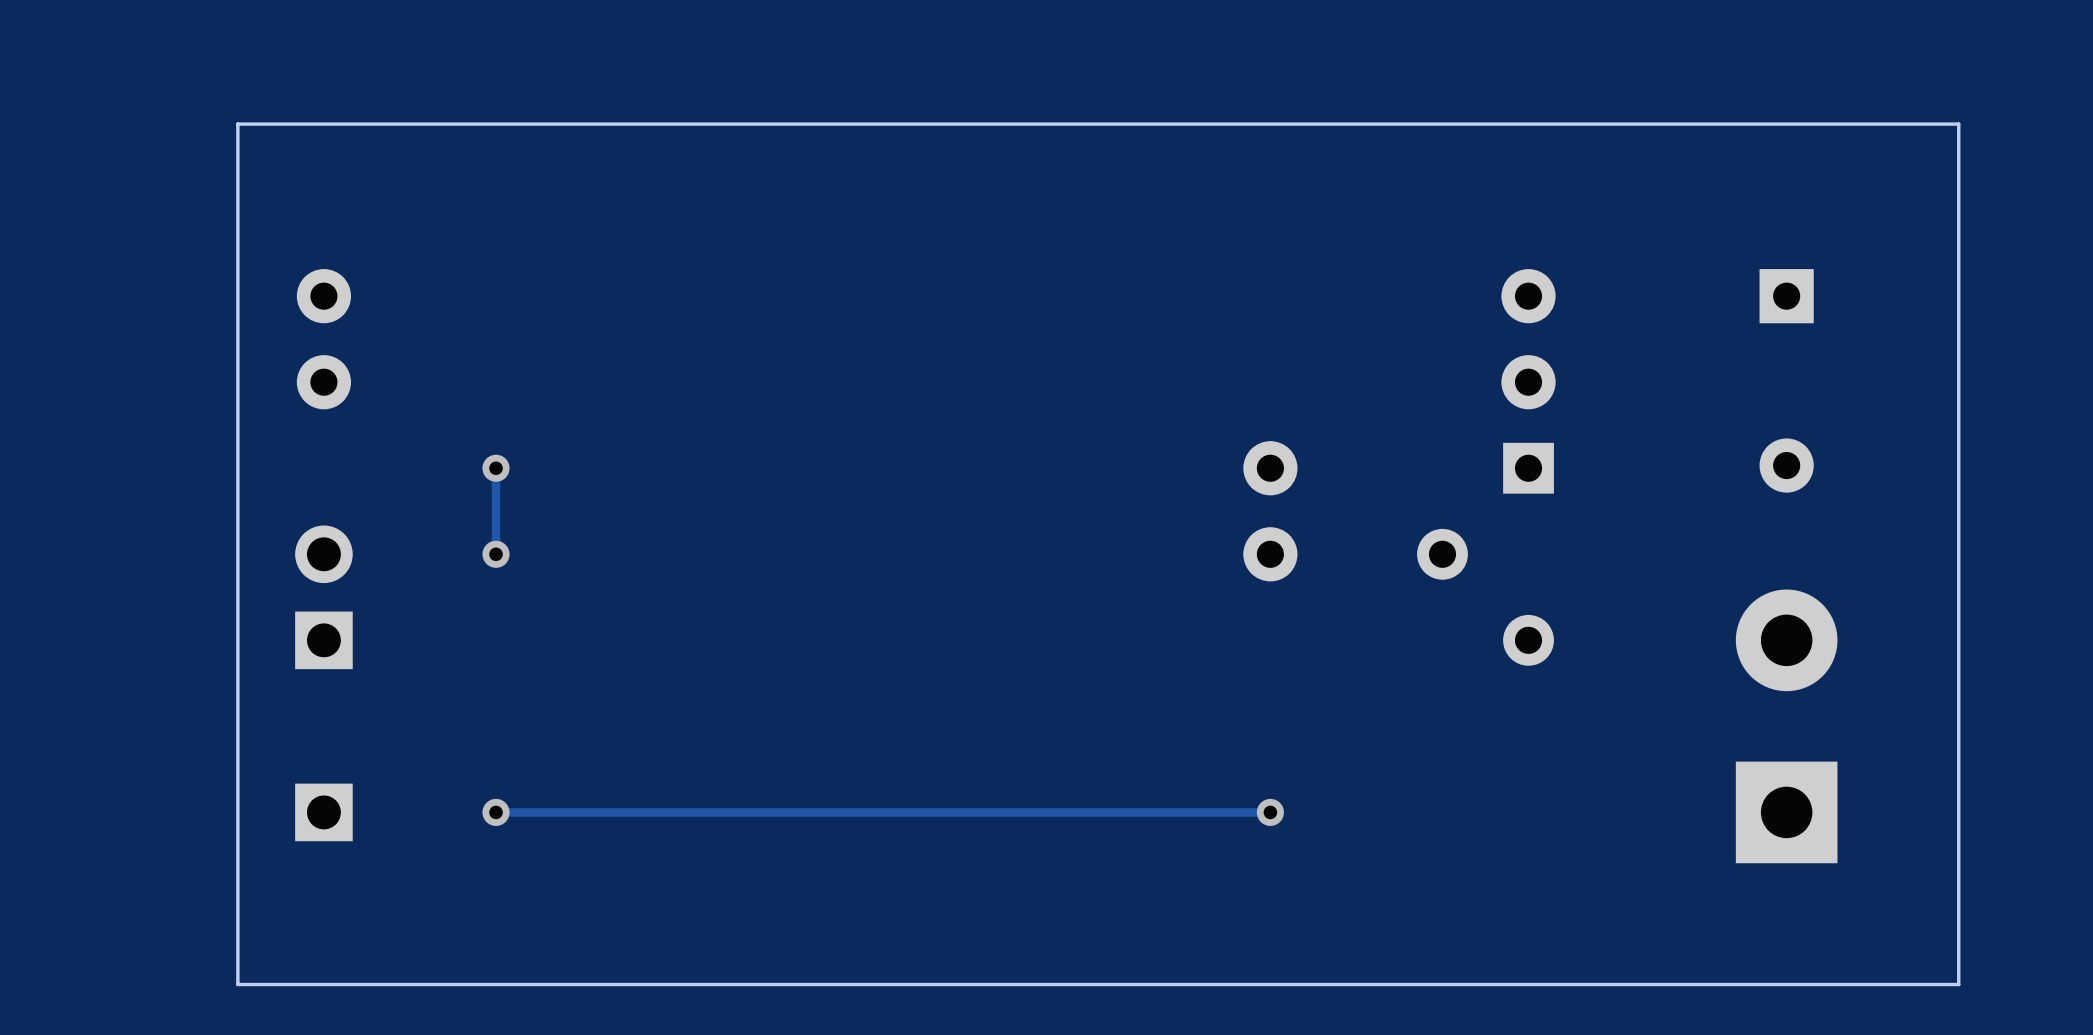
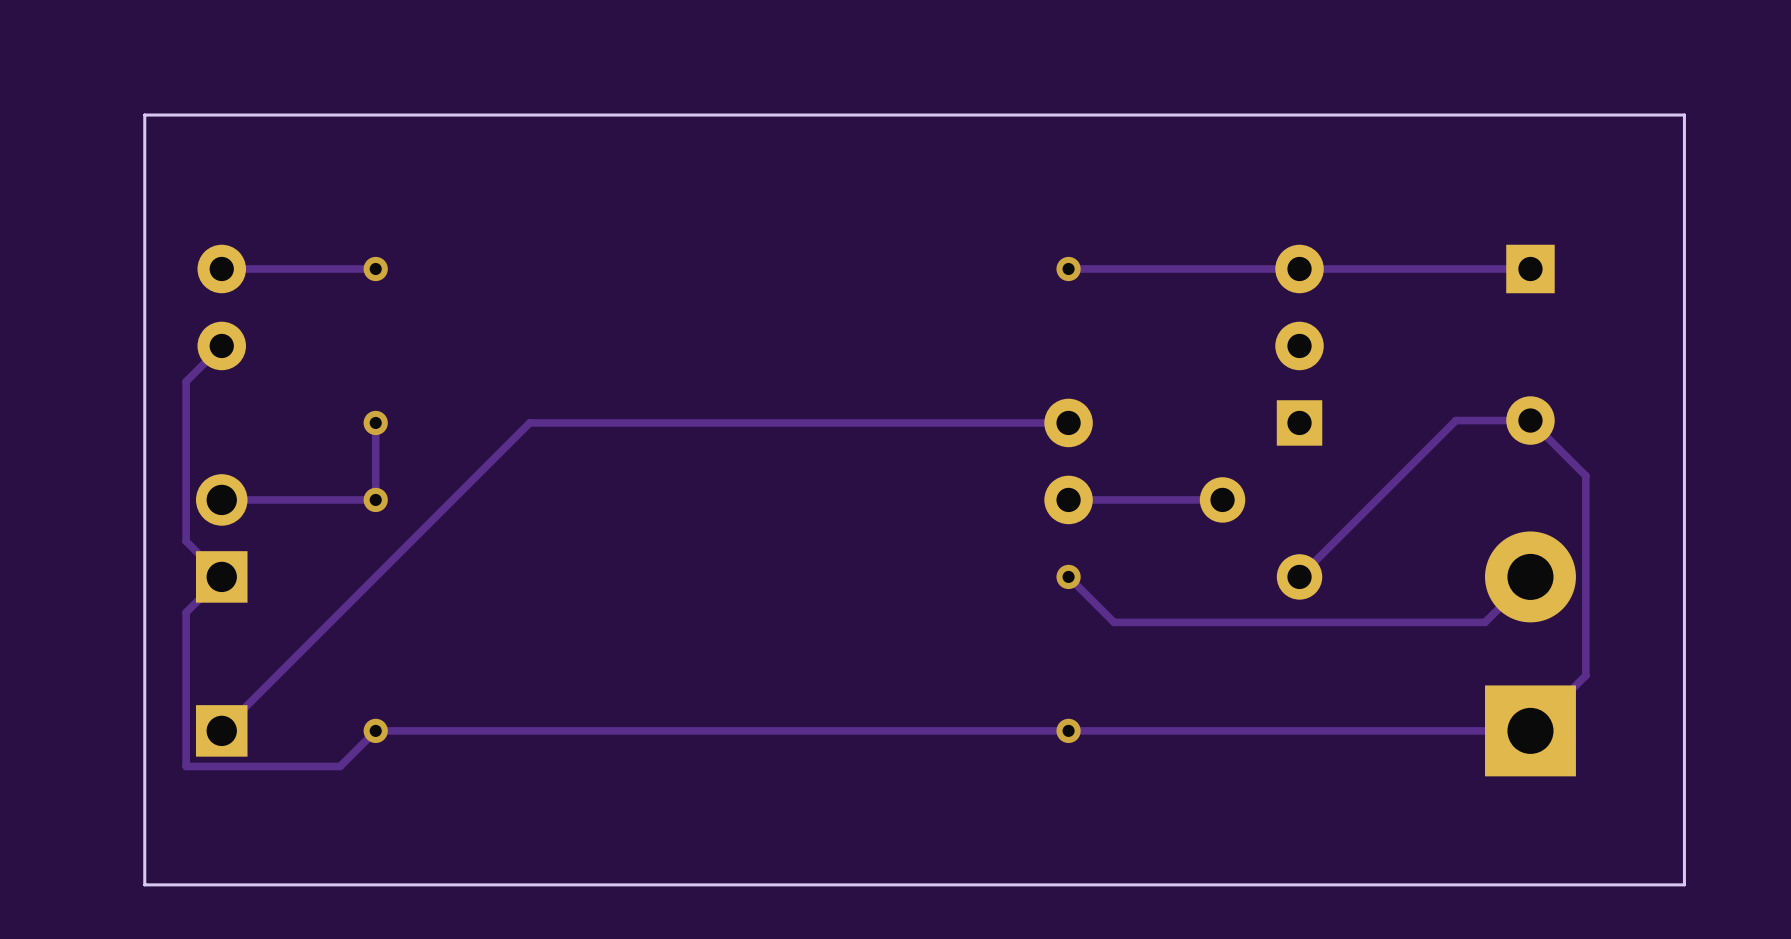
track: none -> (375, 268) (221, 268)
via: none -> (375, 268)
via: none -> (1068, 268)
track: none -> (1530, 268) (1068, 268)
track: none -> (221, 345) (186, 381) (186, 541) (221, 576) (186, 612) (186, 766) (340, 766) (375, 730)
track: none -> (1068, 422) (529, 422) (221, 730)
track: none -> (375, 499) (221, 499)
track: none -> (1222, 499) (1068, 499)
via: none -> (1068, 576)
track: none -> (1299, 576) (1455, 420) (1530, 420) (1585, 475) (1585, 675) (1530, 730) (1068, 730)
track: none -> (1530, 576) (1485, 622) (1114, 622) (1068, 576)

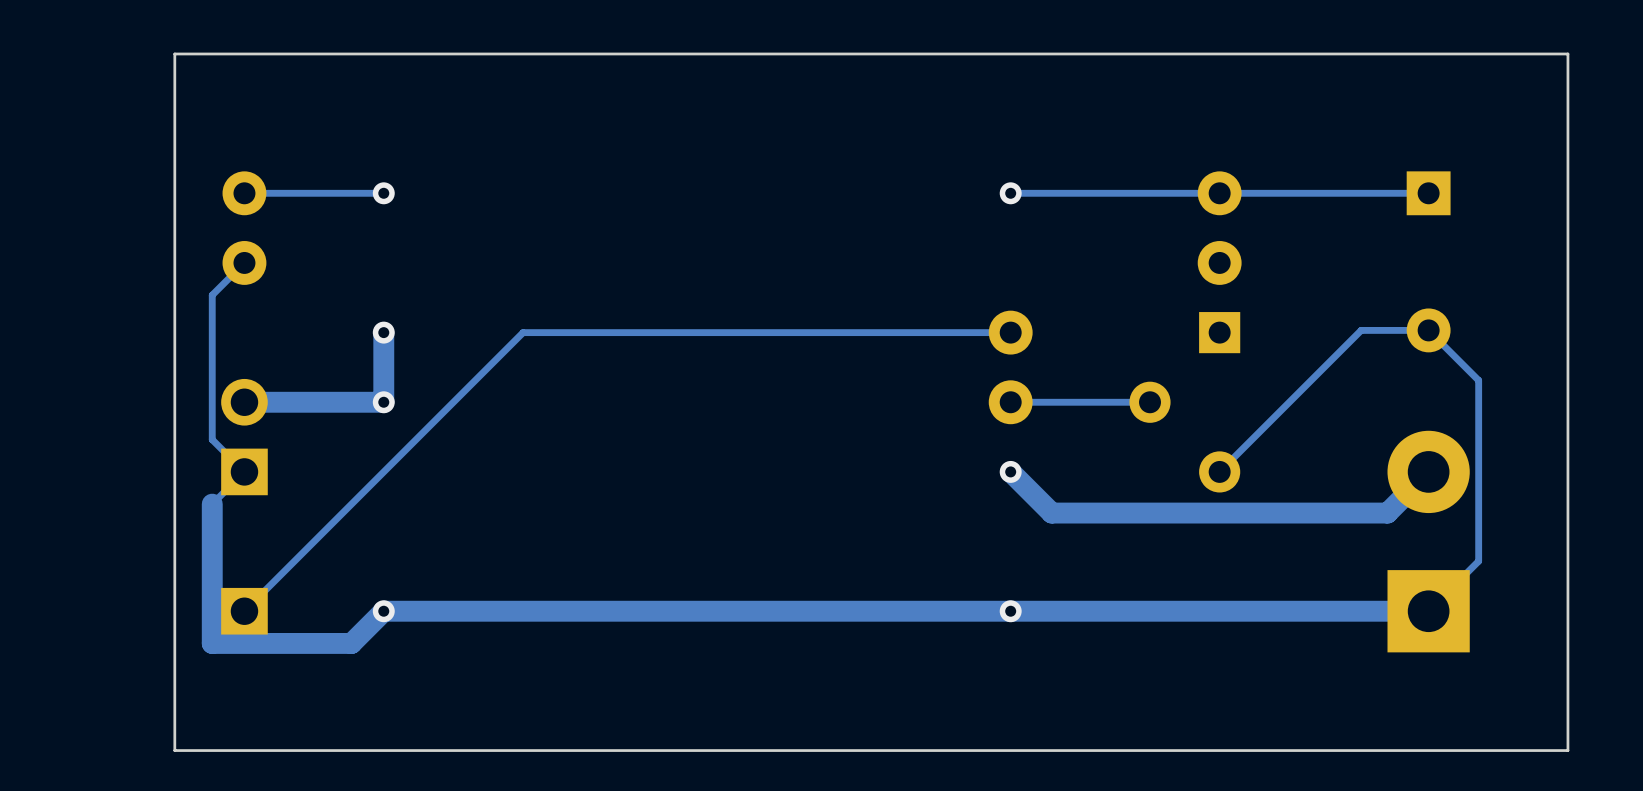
track width: thin (375, 422) (375, 499) (221, 499) -> thick (383, 332) (383, 402) (244, 402)
track width: thin (1530, 576) (1485, 622) (1114, 622) (1068, 576) -> thick (1428, 471) (1387, 513) (1051, 513) (1010, 471)
track width: thin (186, 612) (186, 766) (340, 766) (375, 730) (1530, 730) -> thick (212, 504) (212, 643) (351, 643) (383, 611) (1428, 611)

